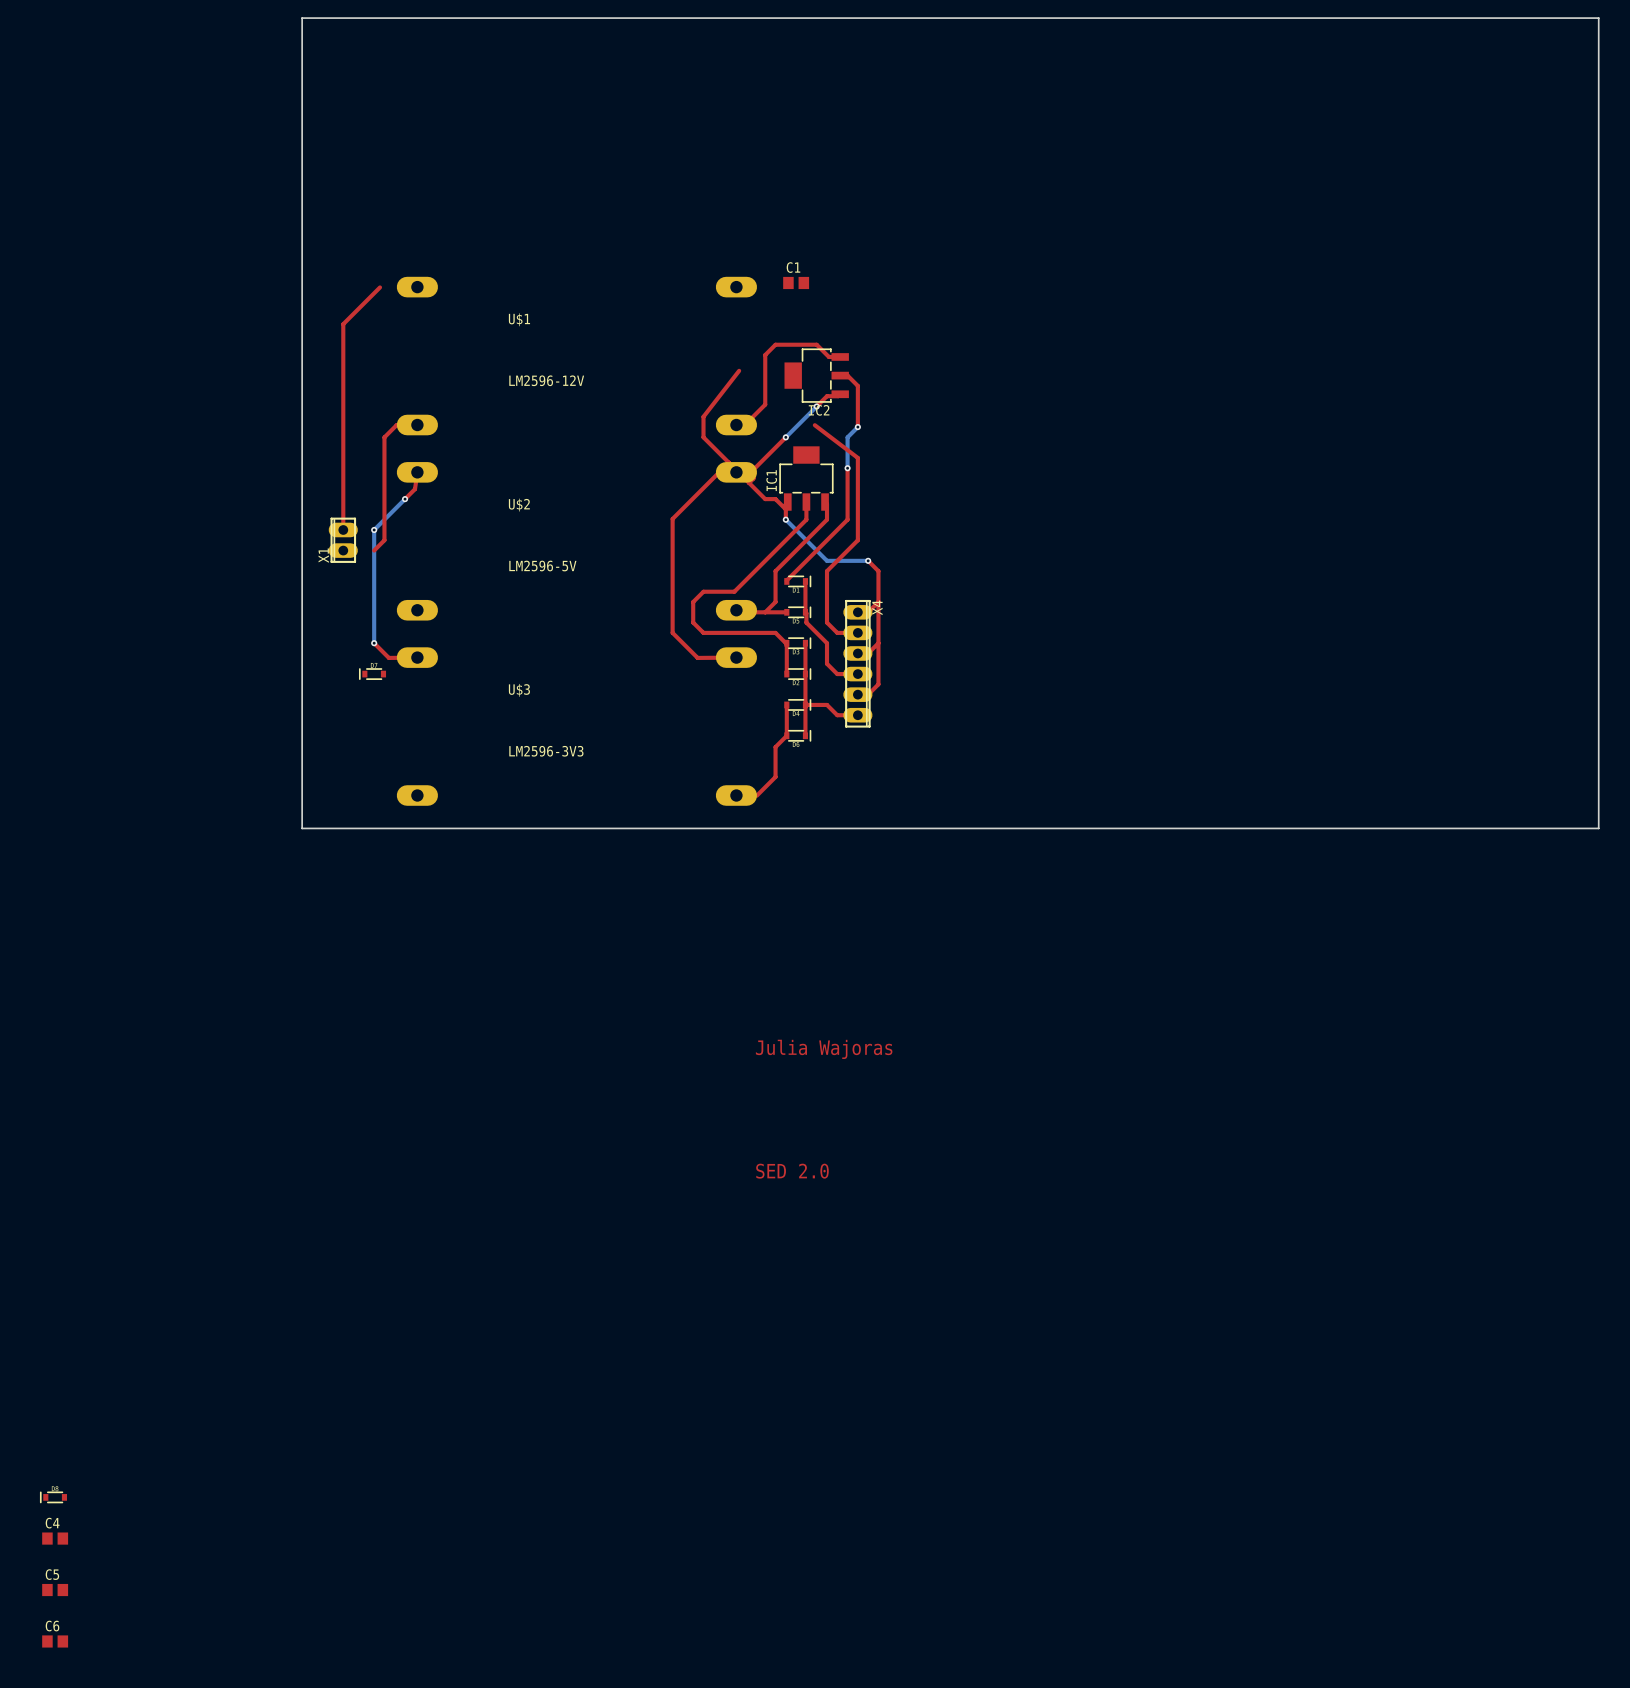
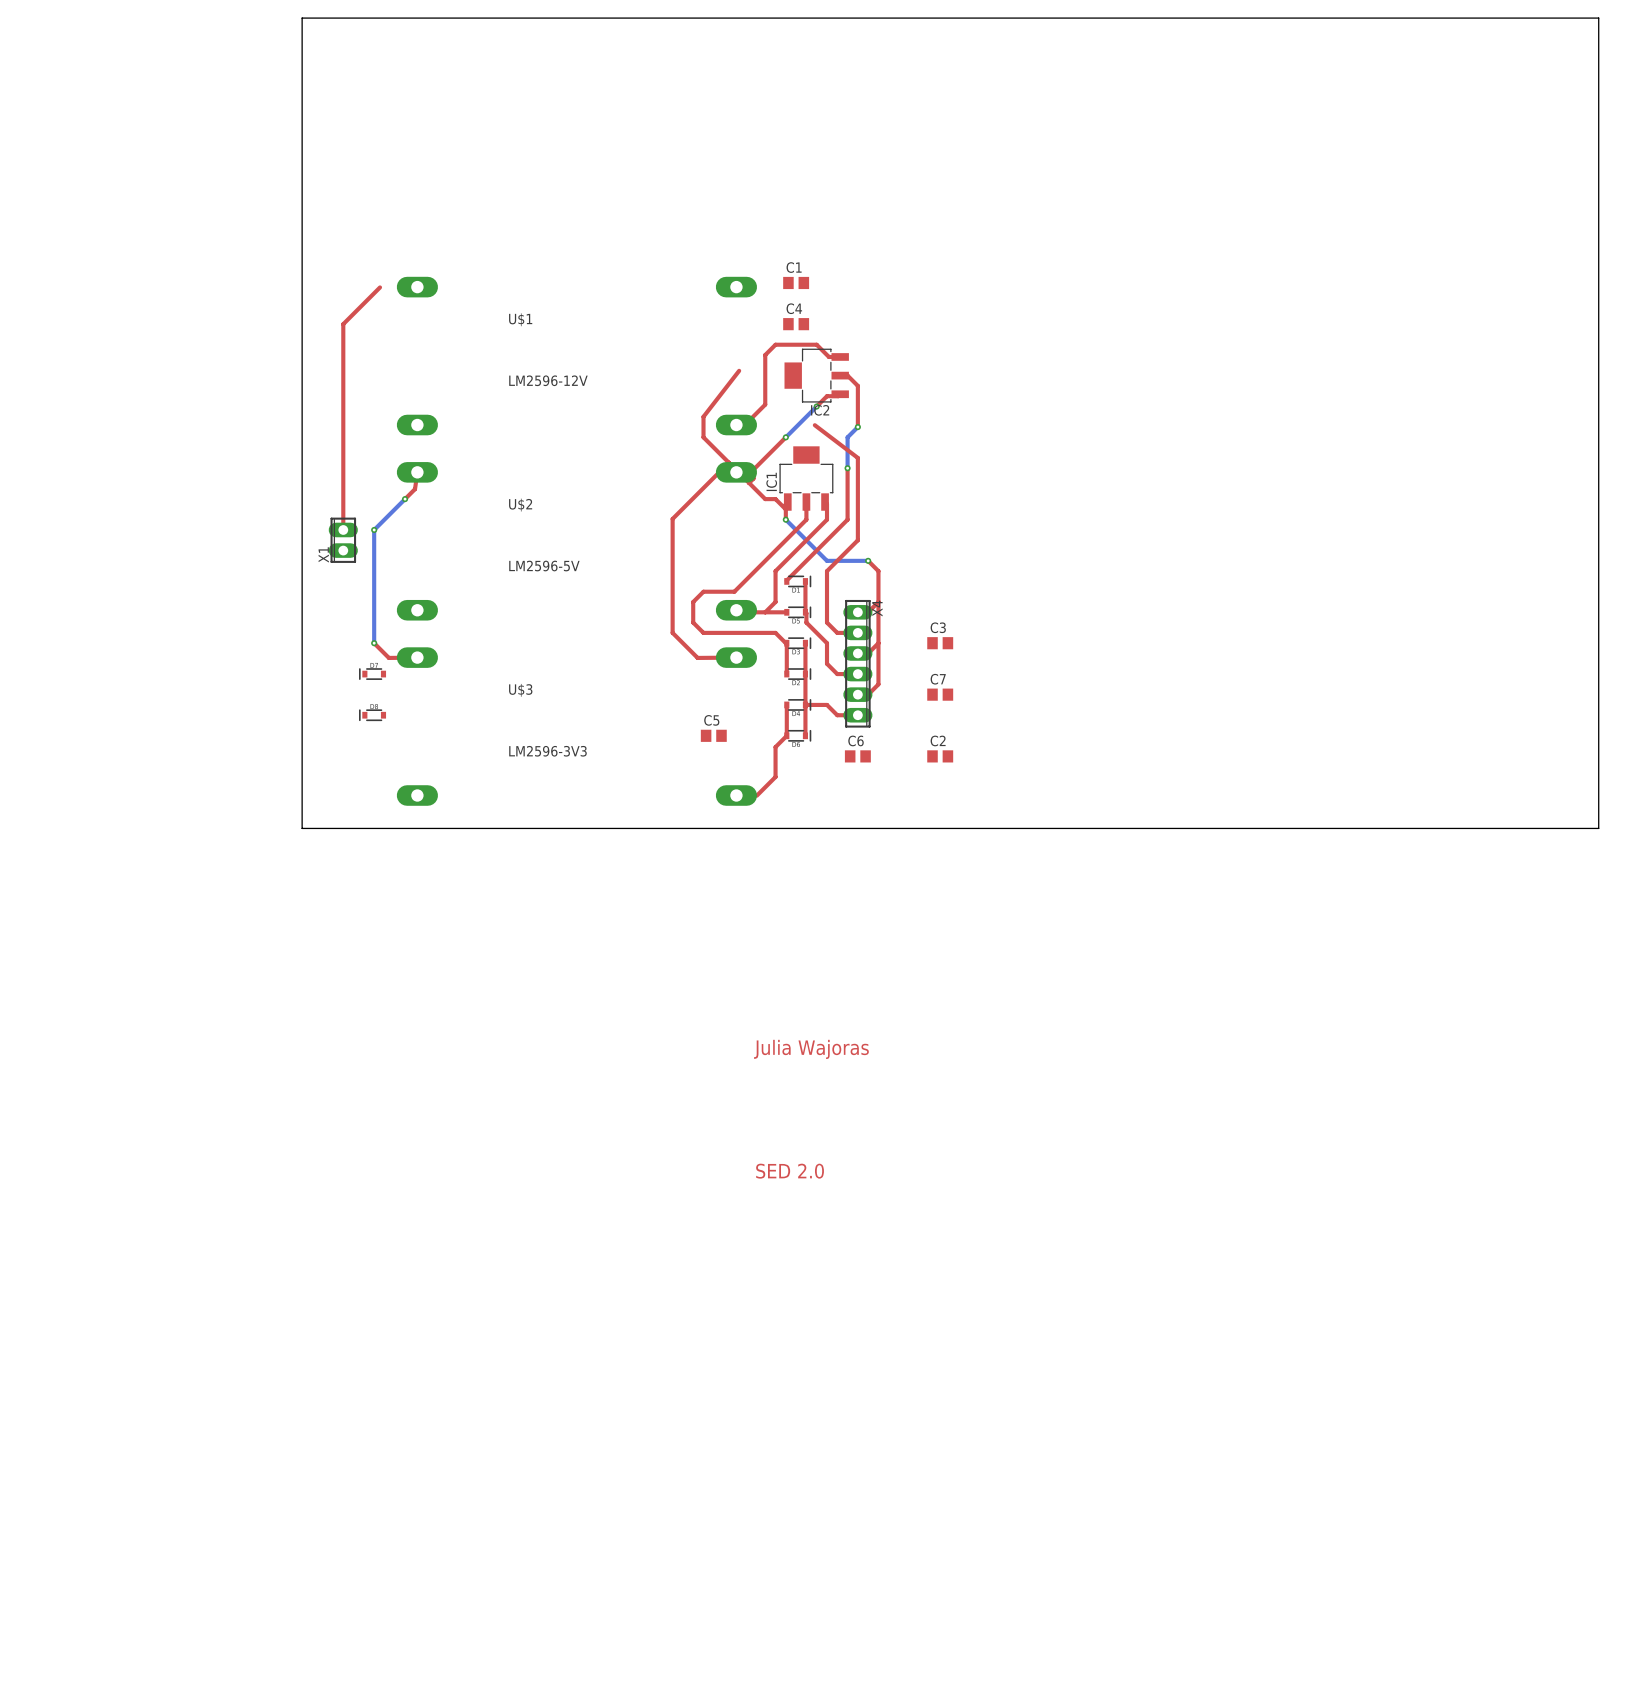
top track: (417, 425) (396, 425) (384, 437) (384, 540) (374, 550) -> none
C3: none -> (940, 643)
C7: none -> (940, 694)
C2: none -> (940, 756)
part position: (53, 1497) -> (372, 715)
C4 position: (55, 1538) -> (796, 324)
C5 position: (55, 1590) -> (713, 735)
C6 position: (55, 1641) -> (857, 756)

